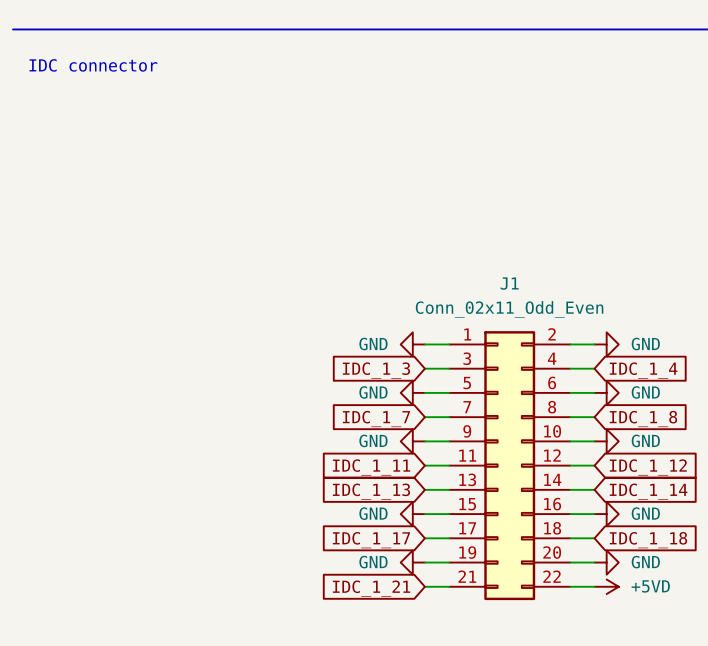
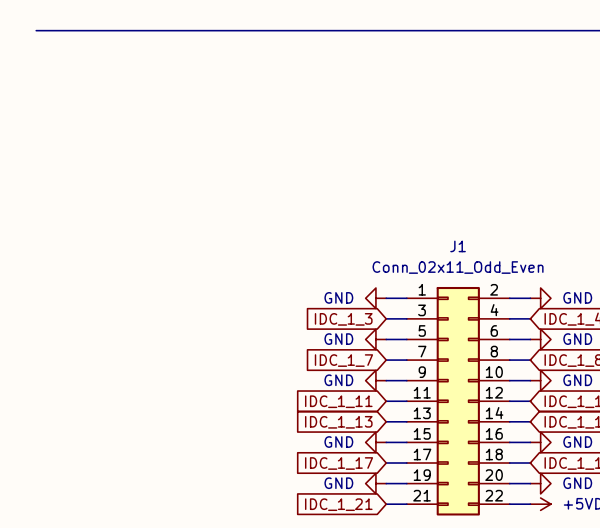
text: IDC connector (93, 65) -> none

